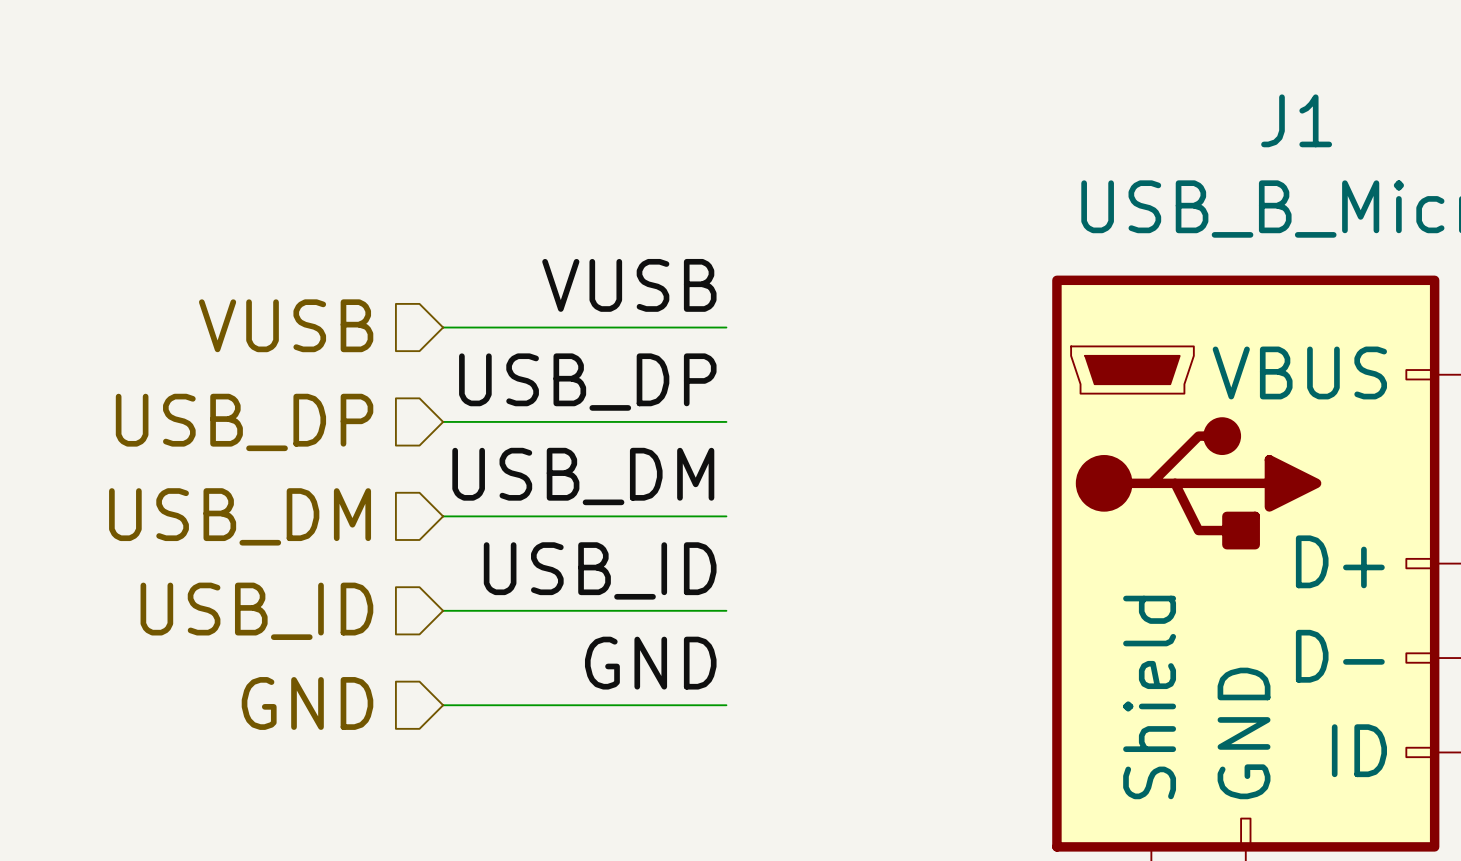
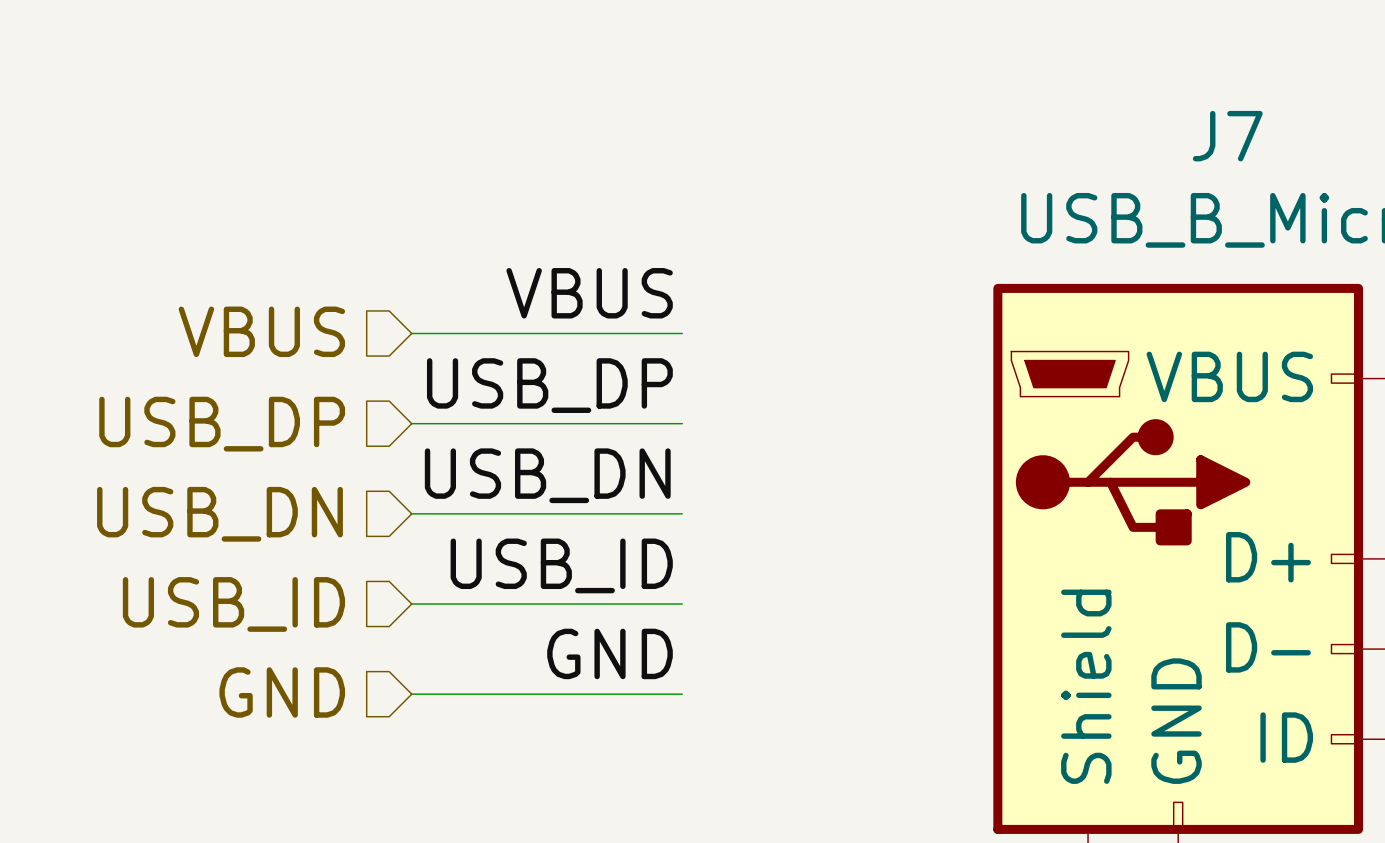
J1 name: J1 (1296, 120) -> J7 (1227, 136)
label: VUSB (629, 285) -> VBUS (589, 293)
hierarchical label: VUSB (286, 325) -> VBUS (261, 331)
label: USB_DM (583, 476) -> USB_DN (547, 475)
hierarchical label: USB_DM (240, 516) -> USB_DN (220, 514)

